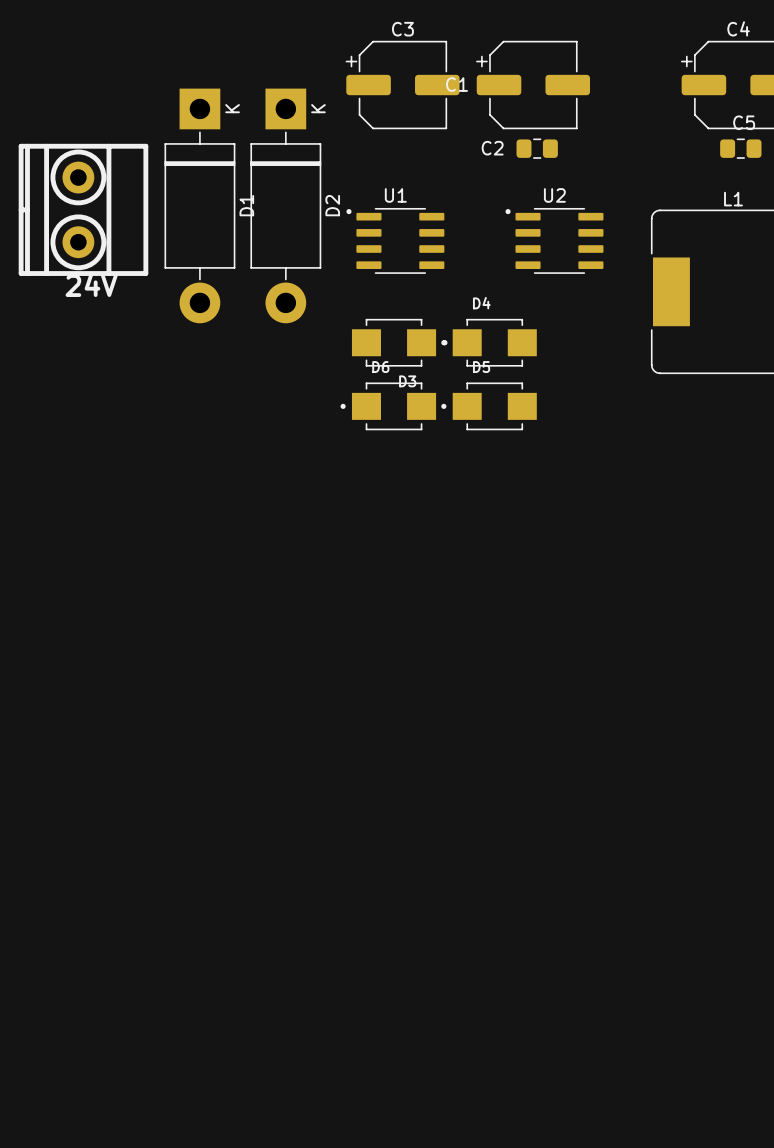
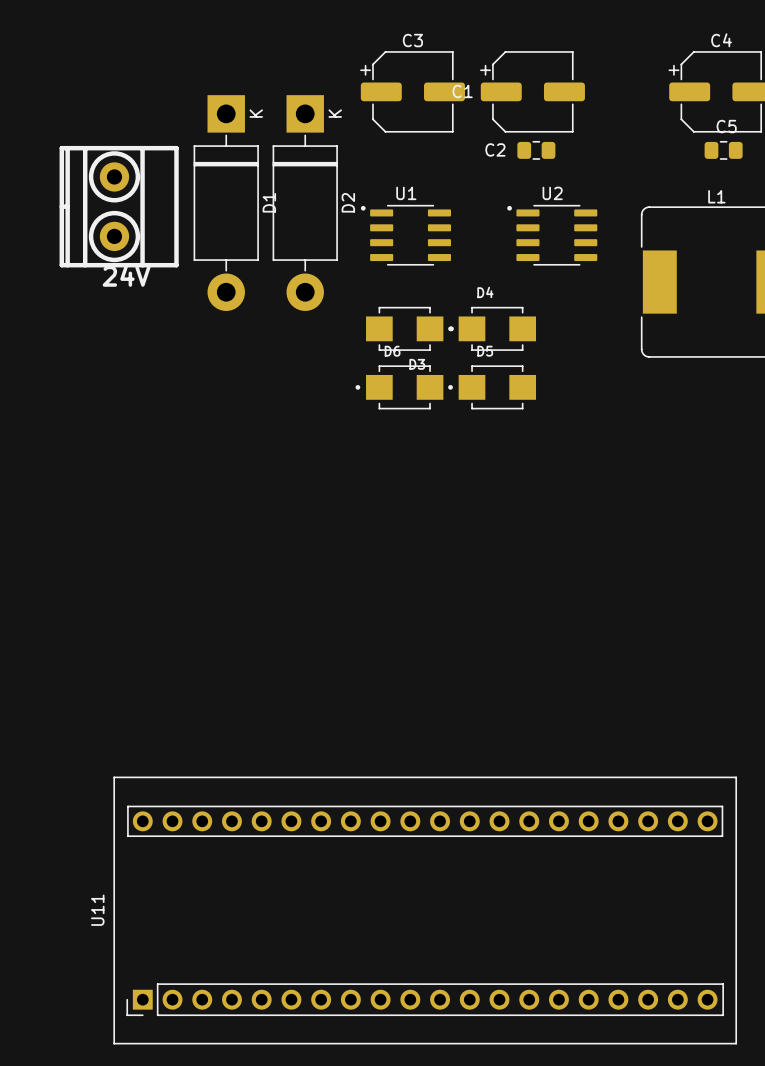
U11: none -> (425, 910)

